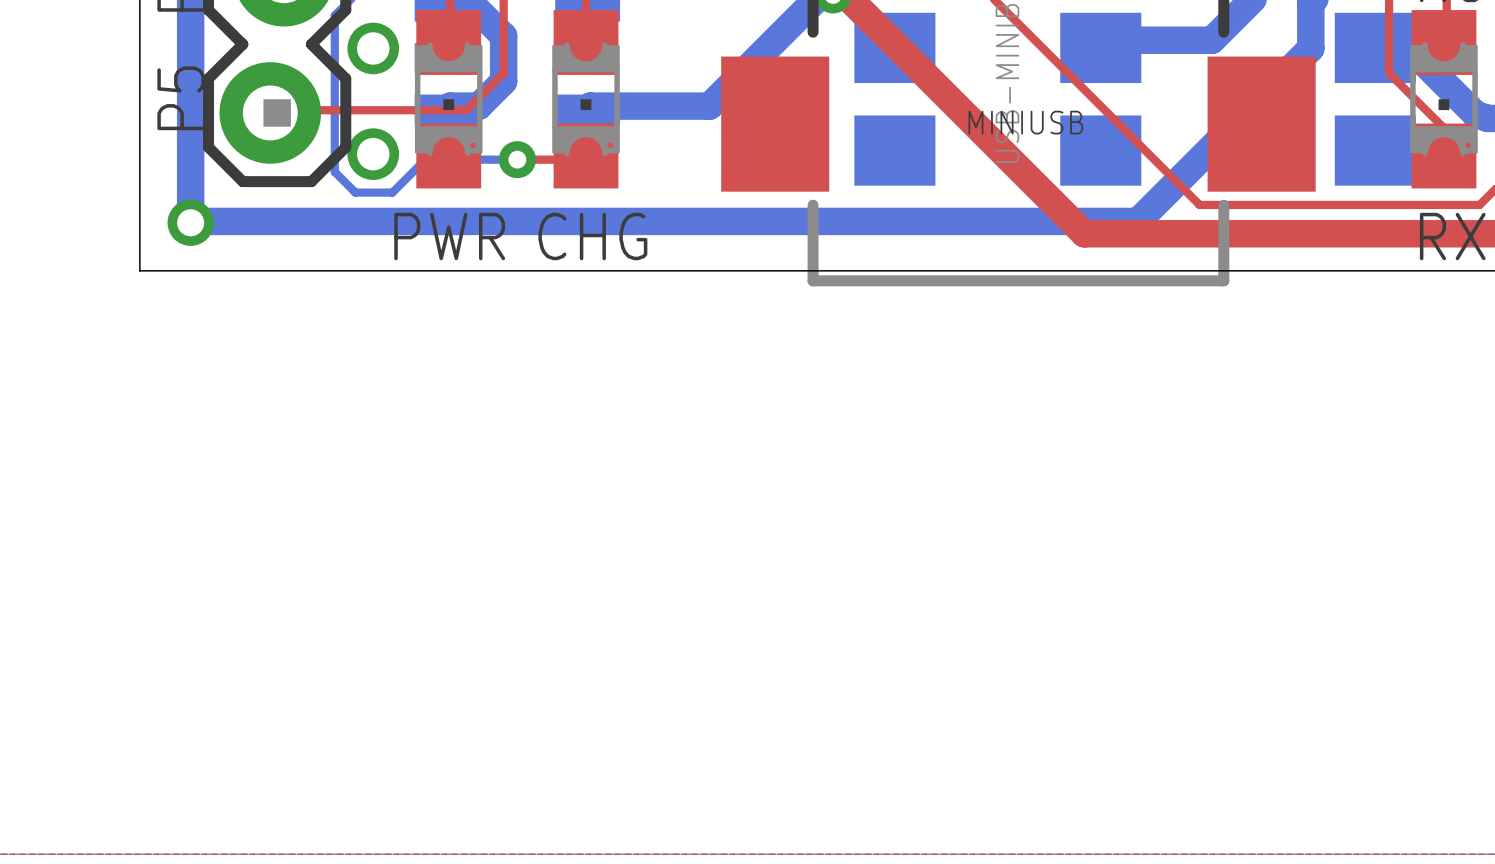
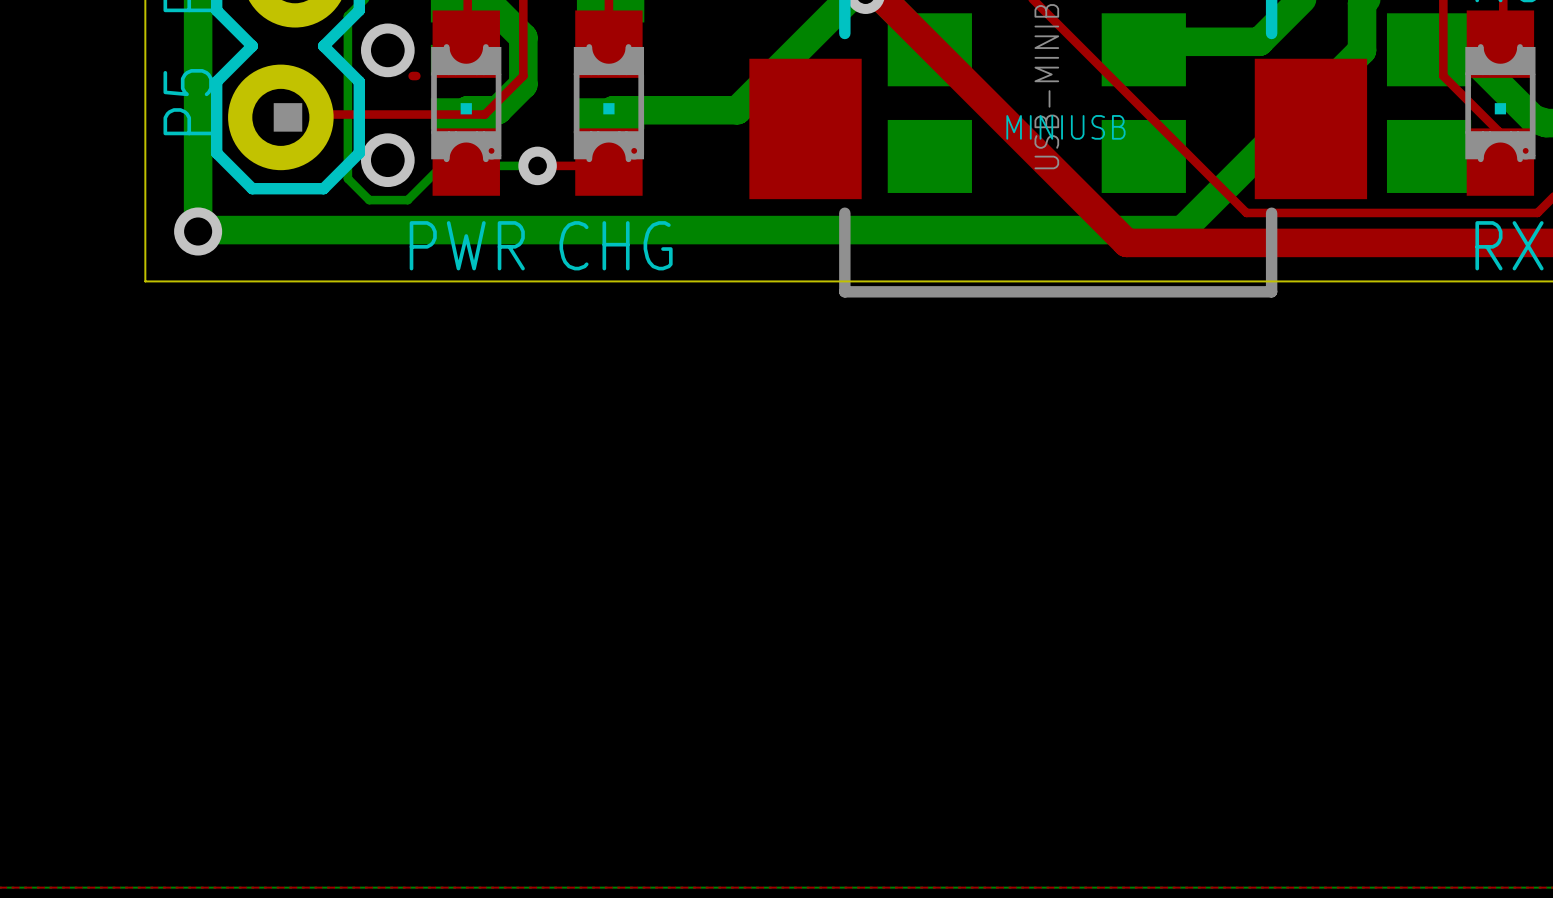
top track: none -> (412, 76) (416, 76)

